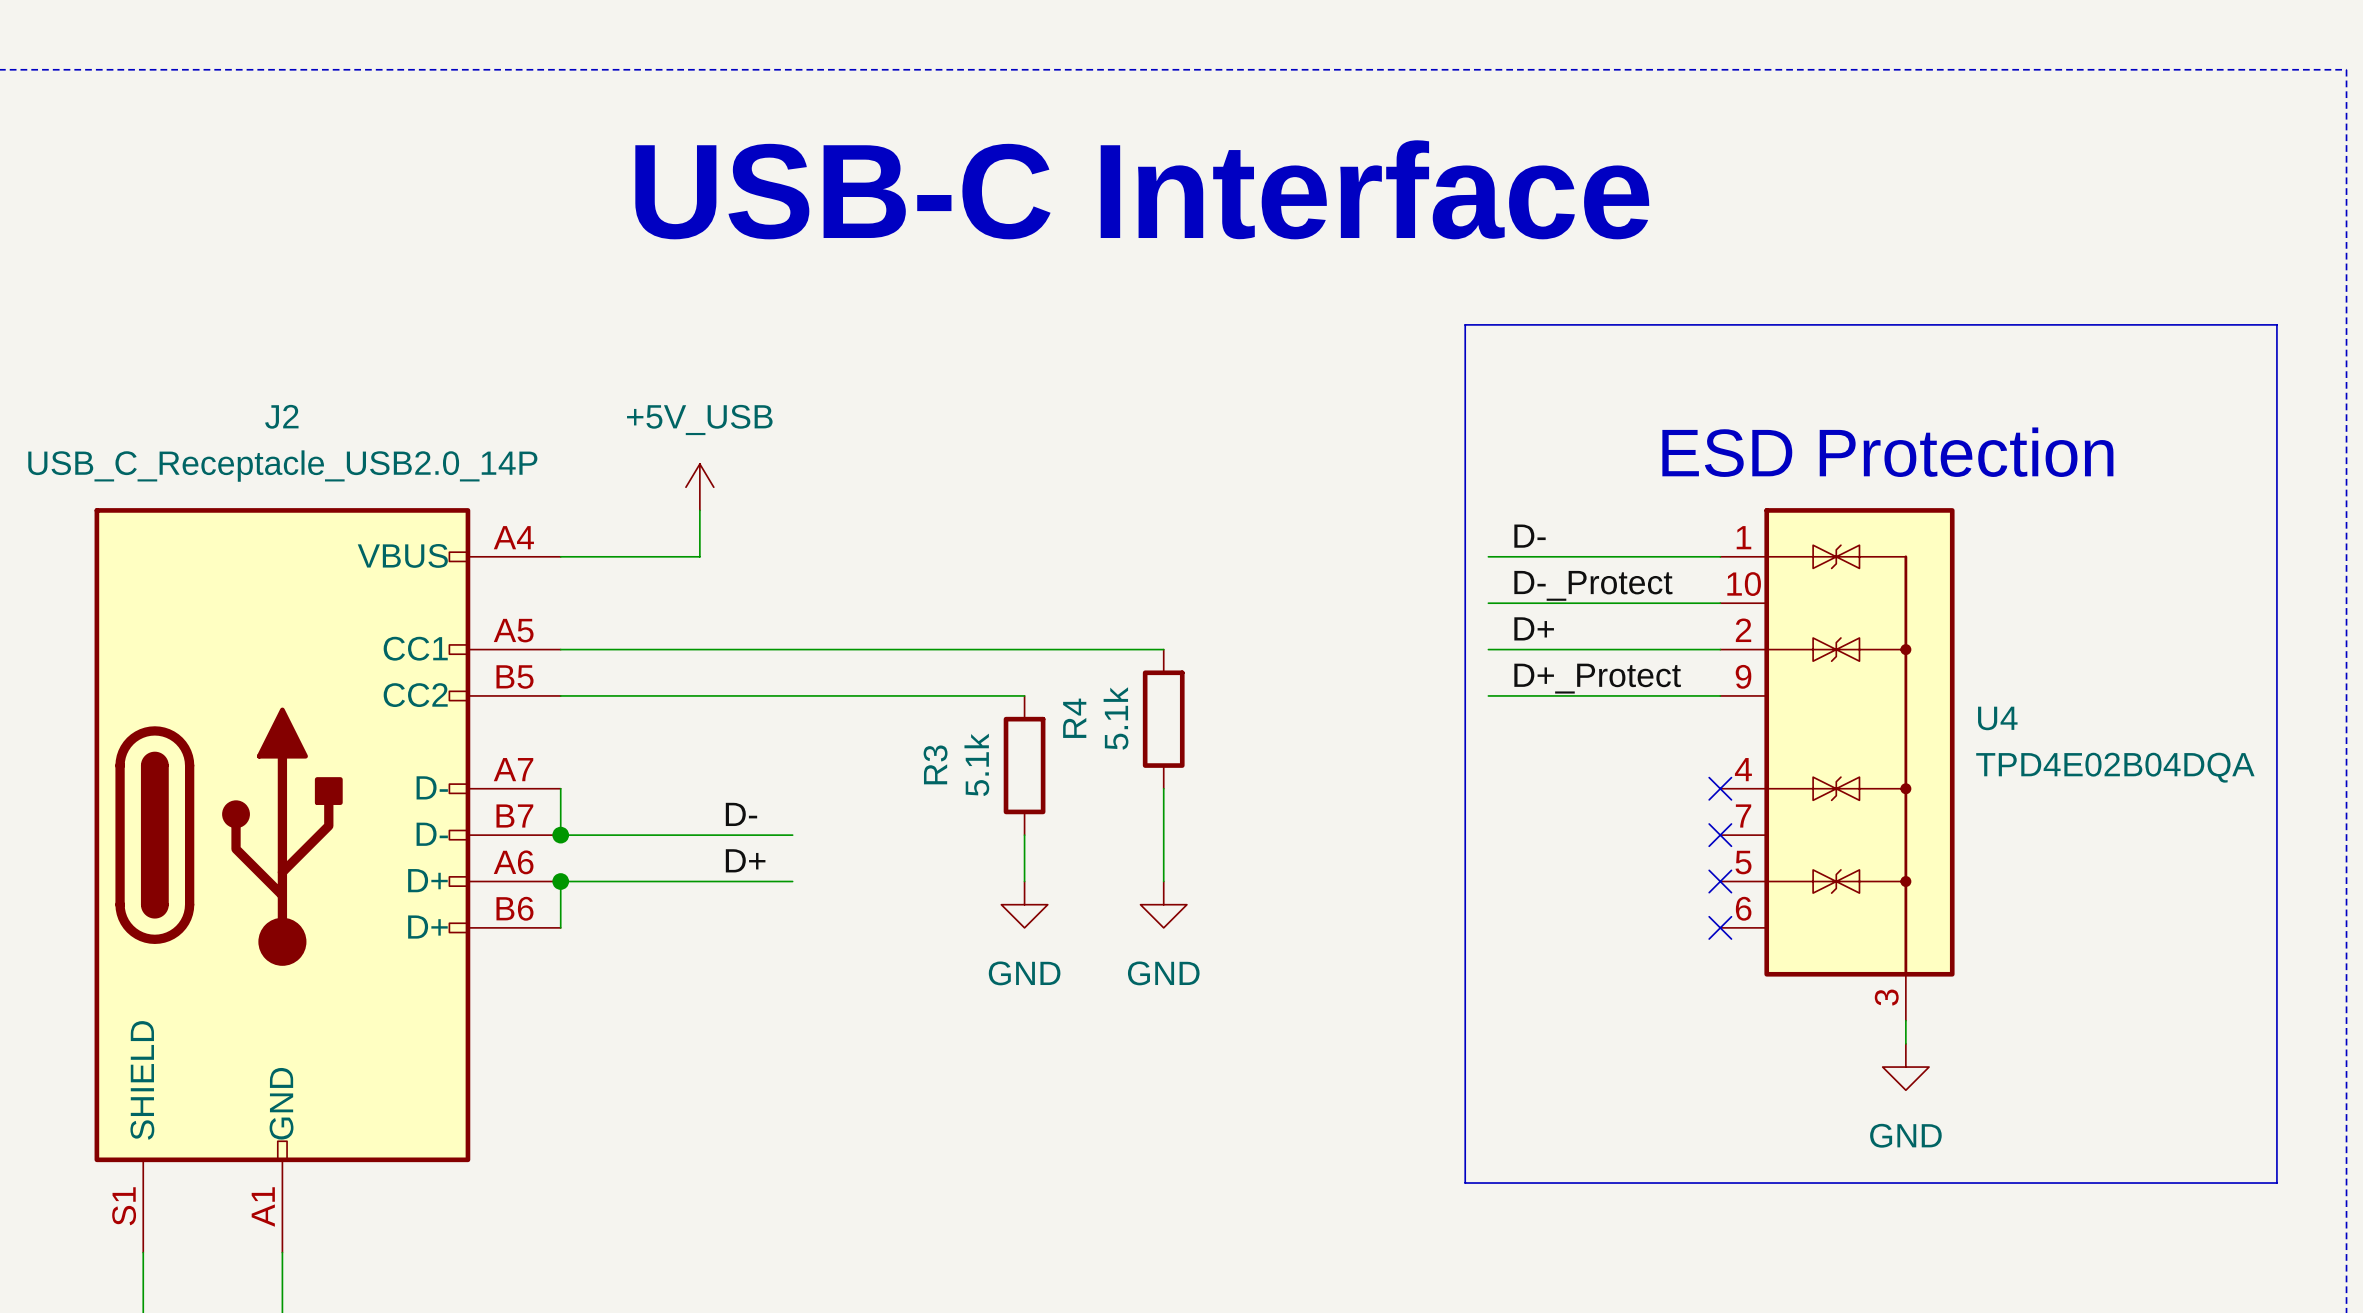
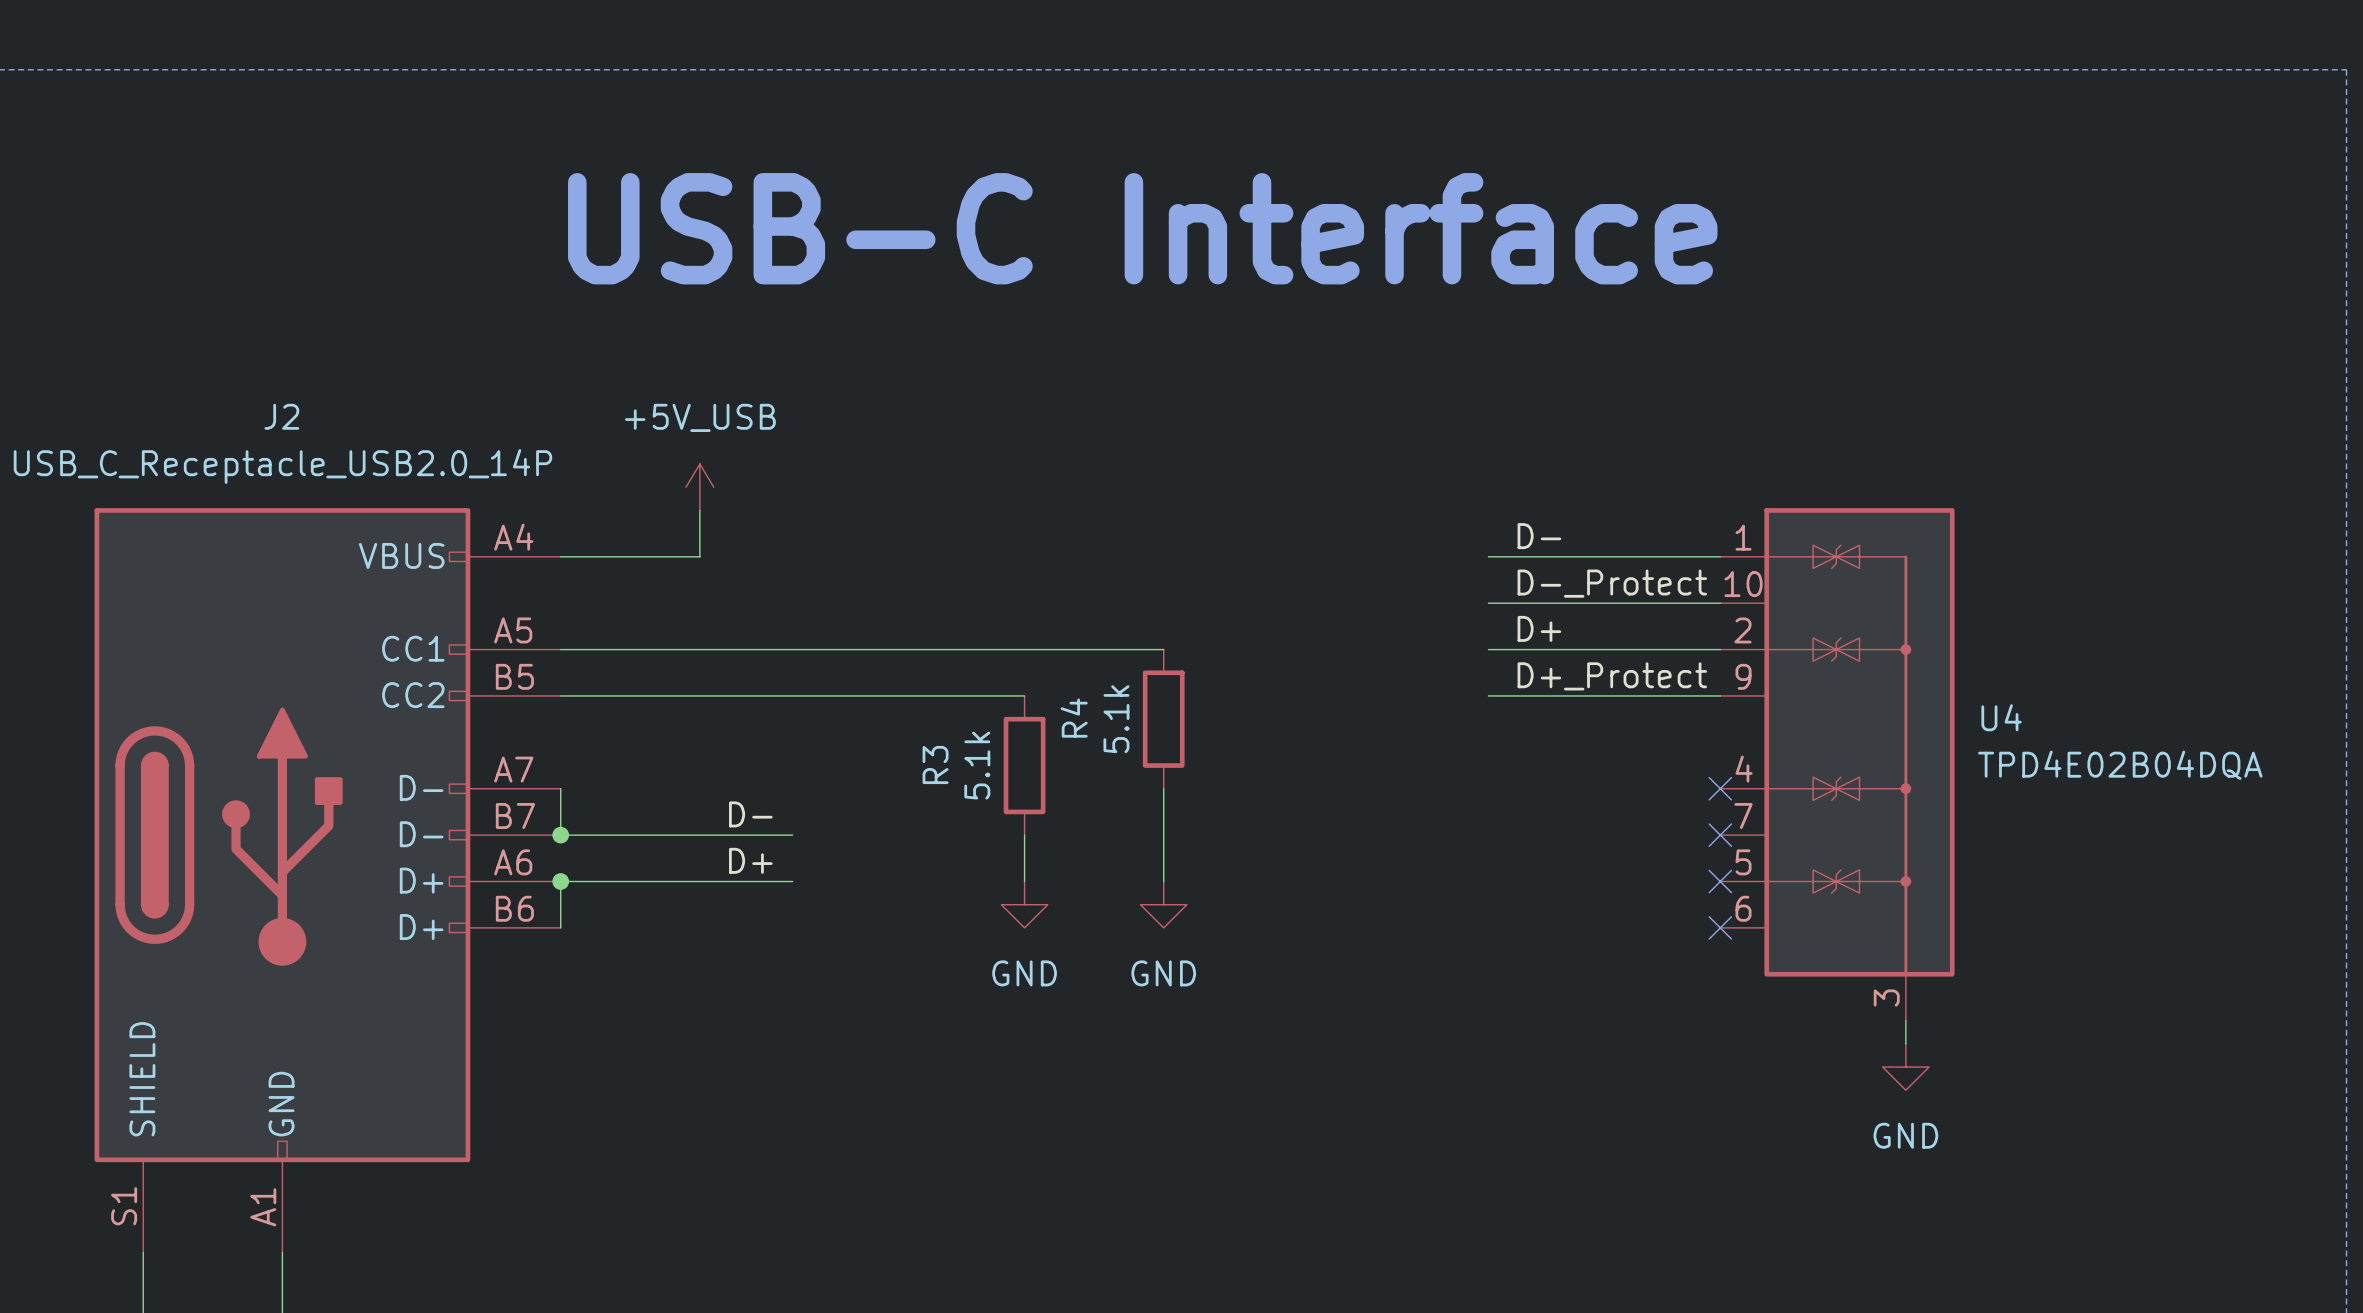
text position: USB-C Interface (1142, 189) -> USB-C Interface (1142, 228)
line: (1465, 324) (2276, 324) (2276, 1183) (1465, 1183) (1465, 324) -> none
text: ESD Protection (1887, 452) -> none

